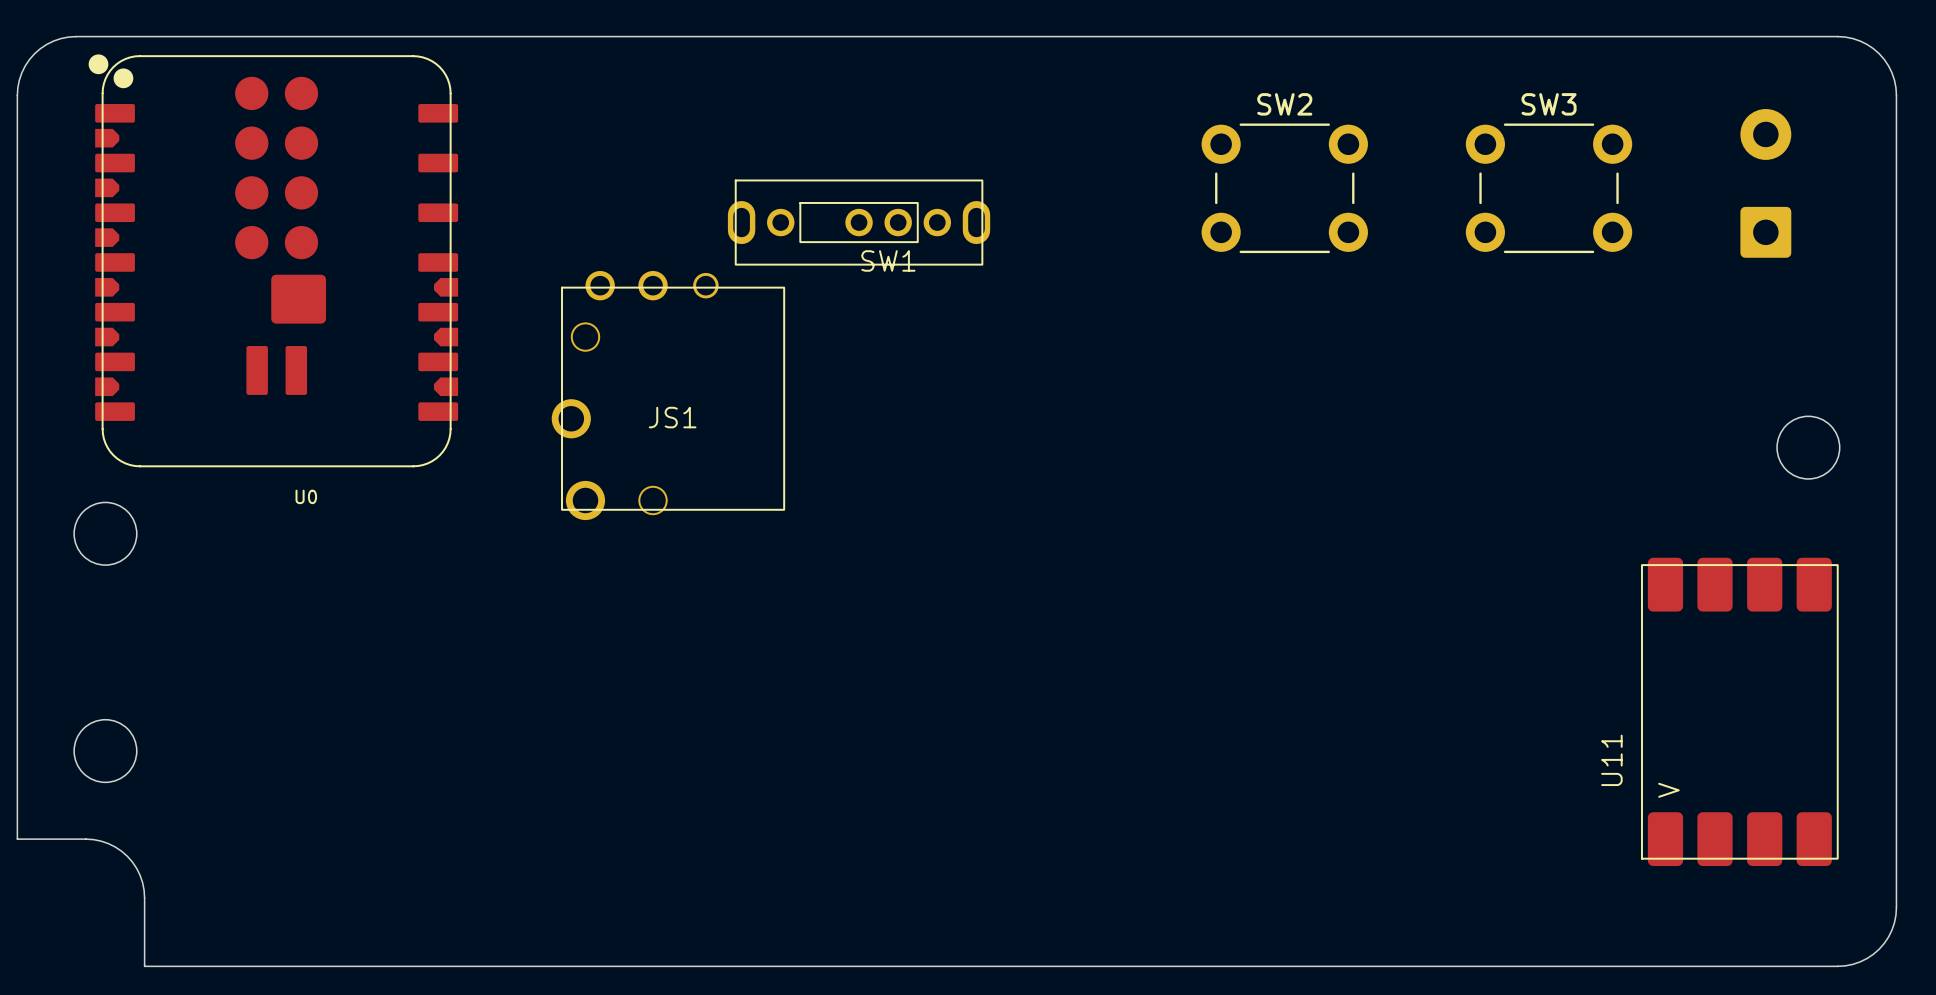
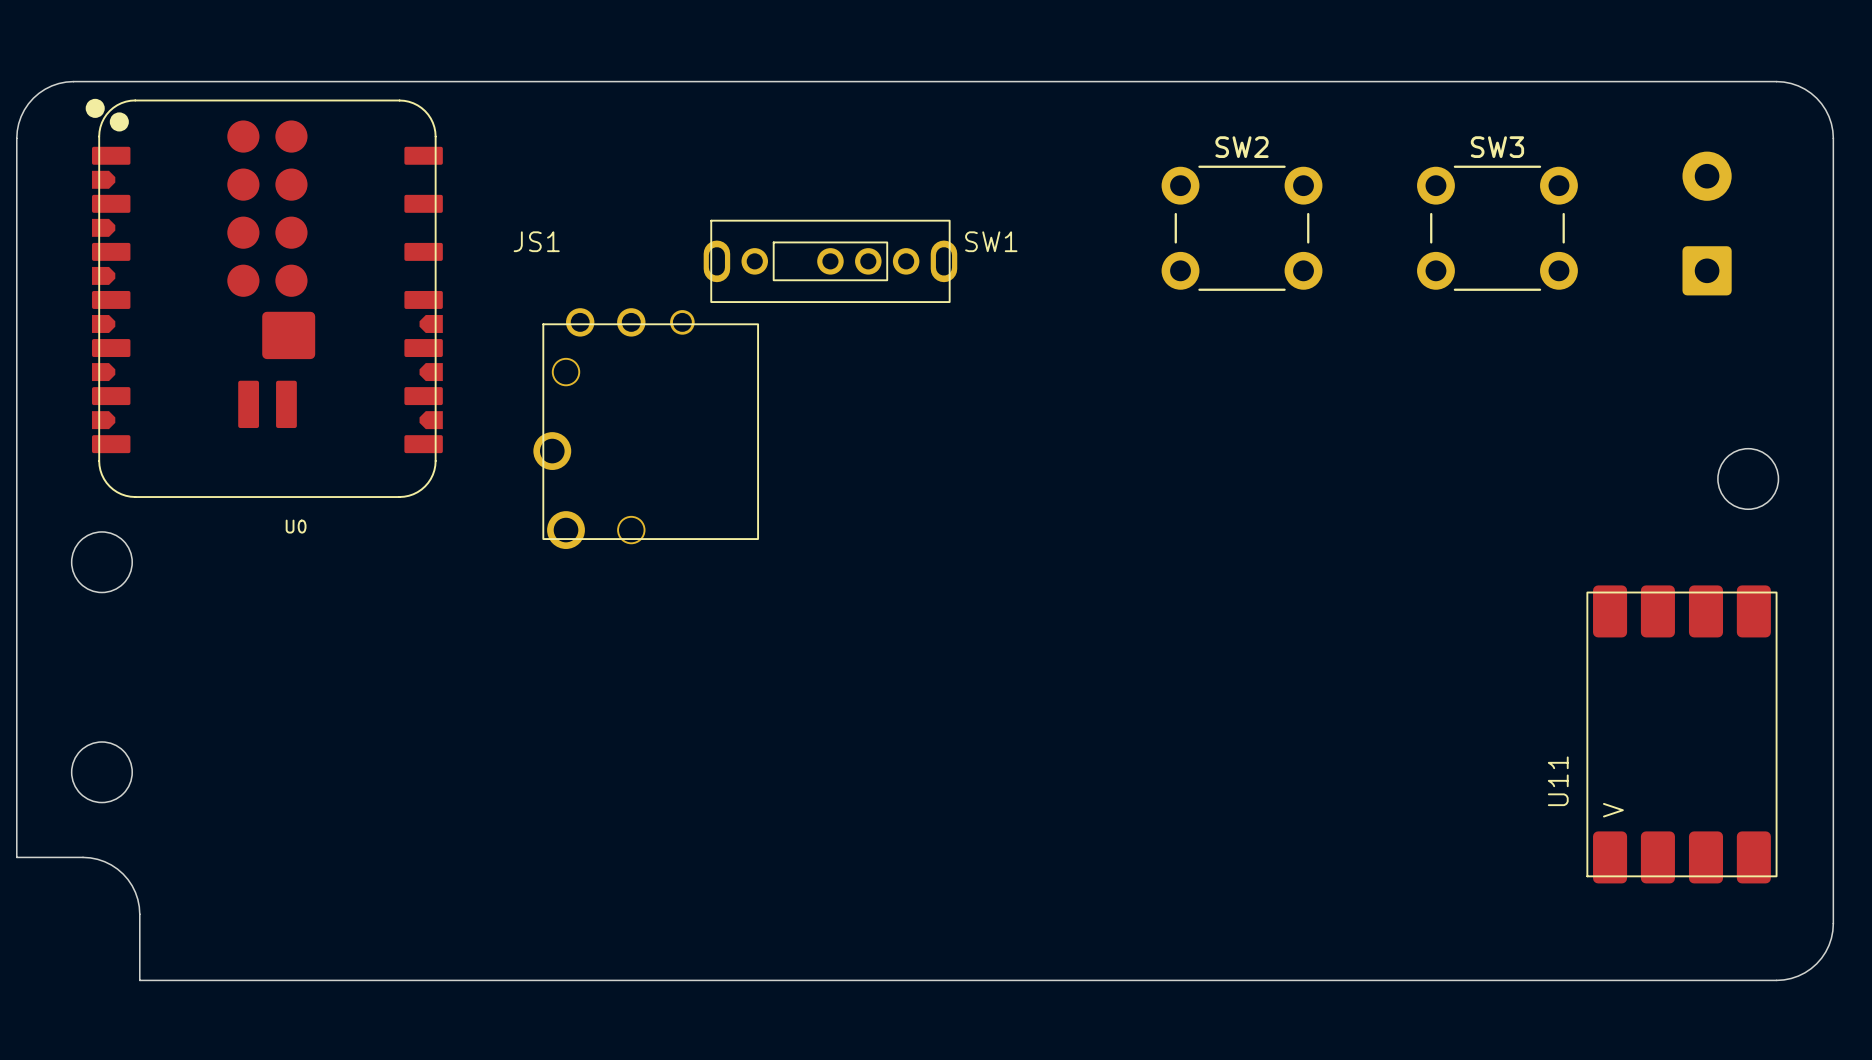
SW1 name position: SW1 (888, 260) -> SW1 (991, 241)
JS1 name position: JS1 (672, 417) -> JS1 (536, 241)

